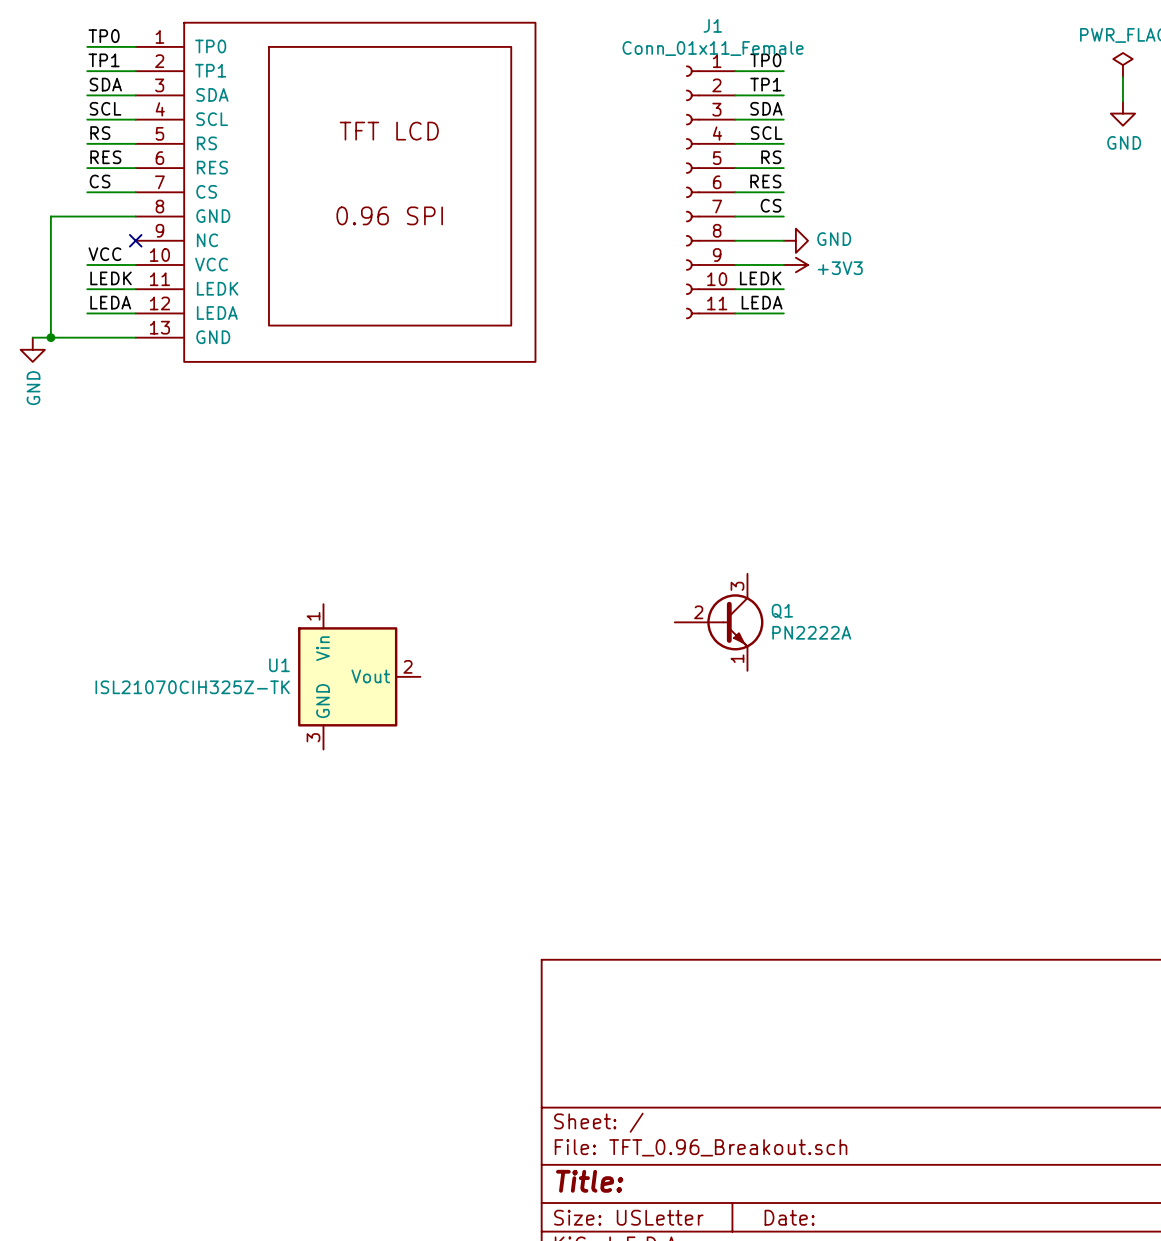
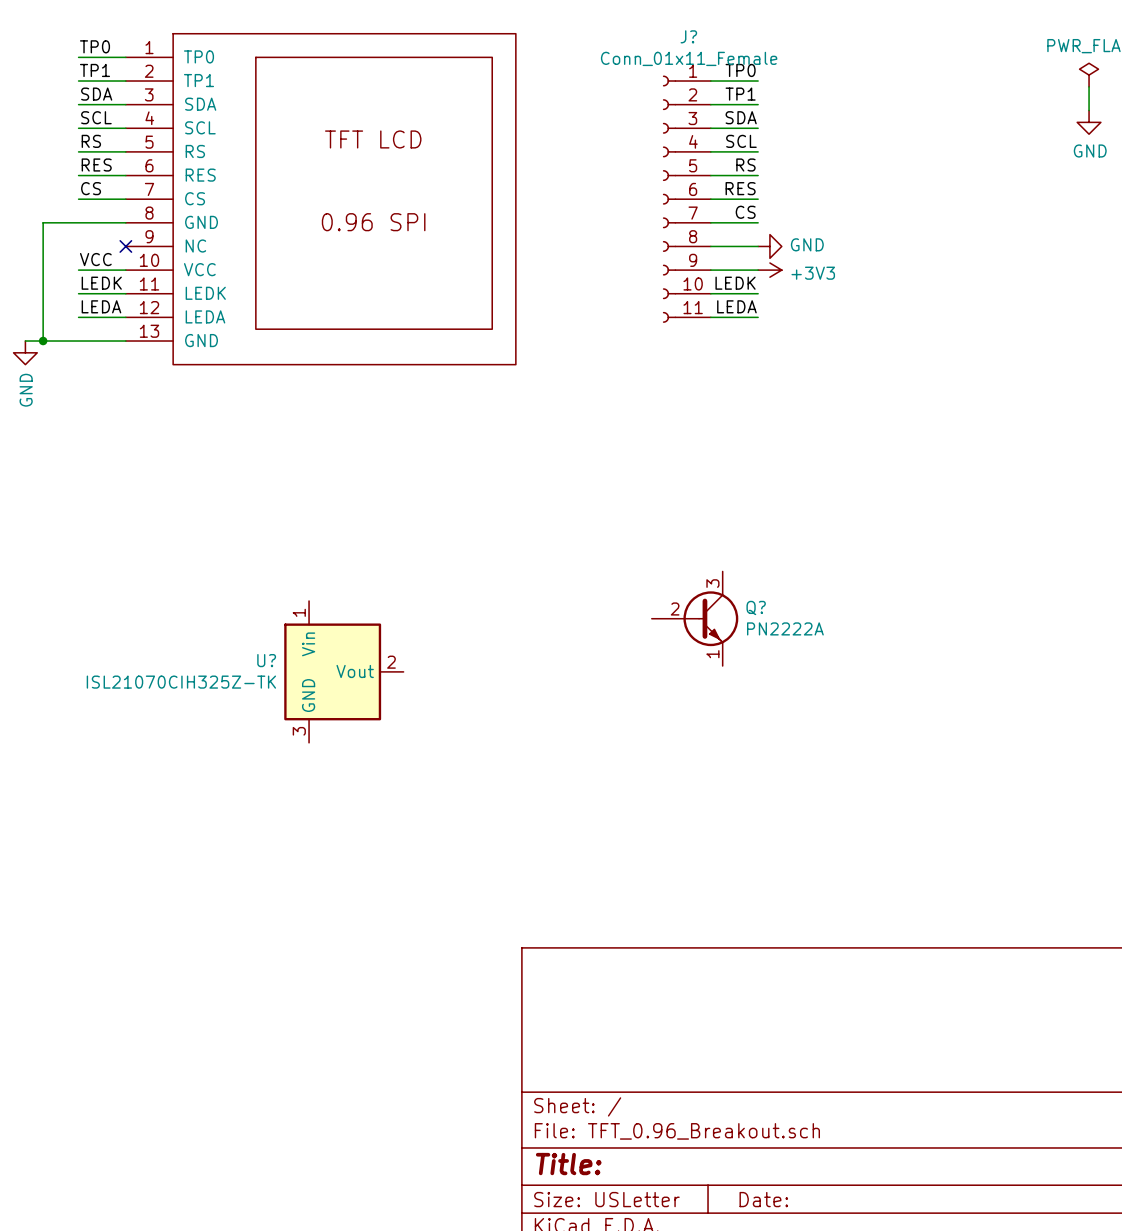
J1 name: J1 (712, 25) -> J? (688, 36)
Q1 name: Q1 (782, 611) -> Q? (756, 607)
U1 name: U1 (279, 665) -> U? (266, 660)

